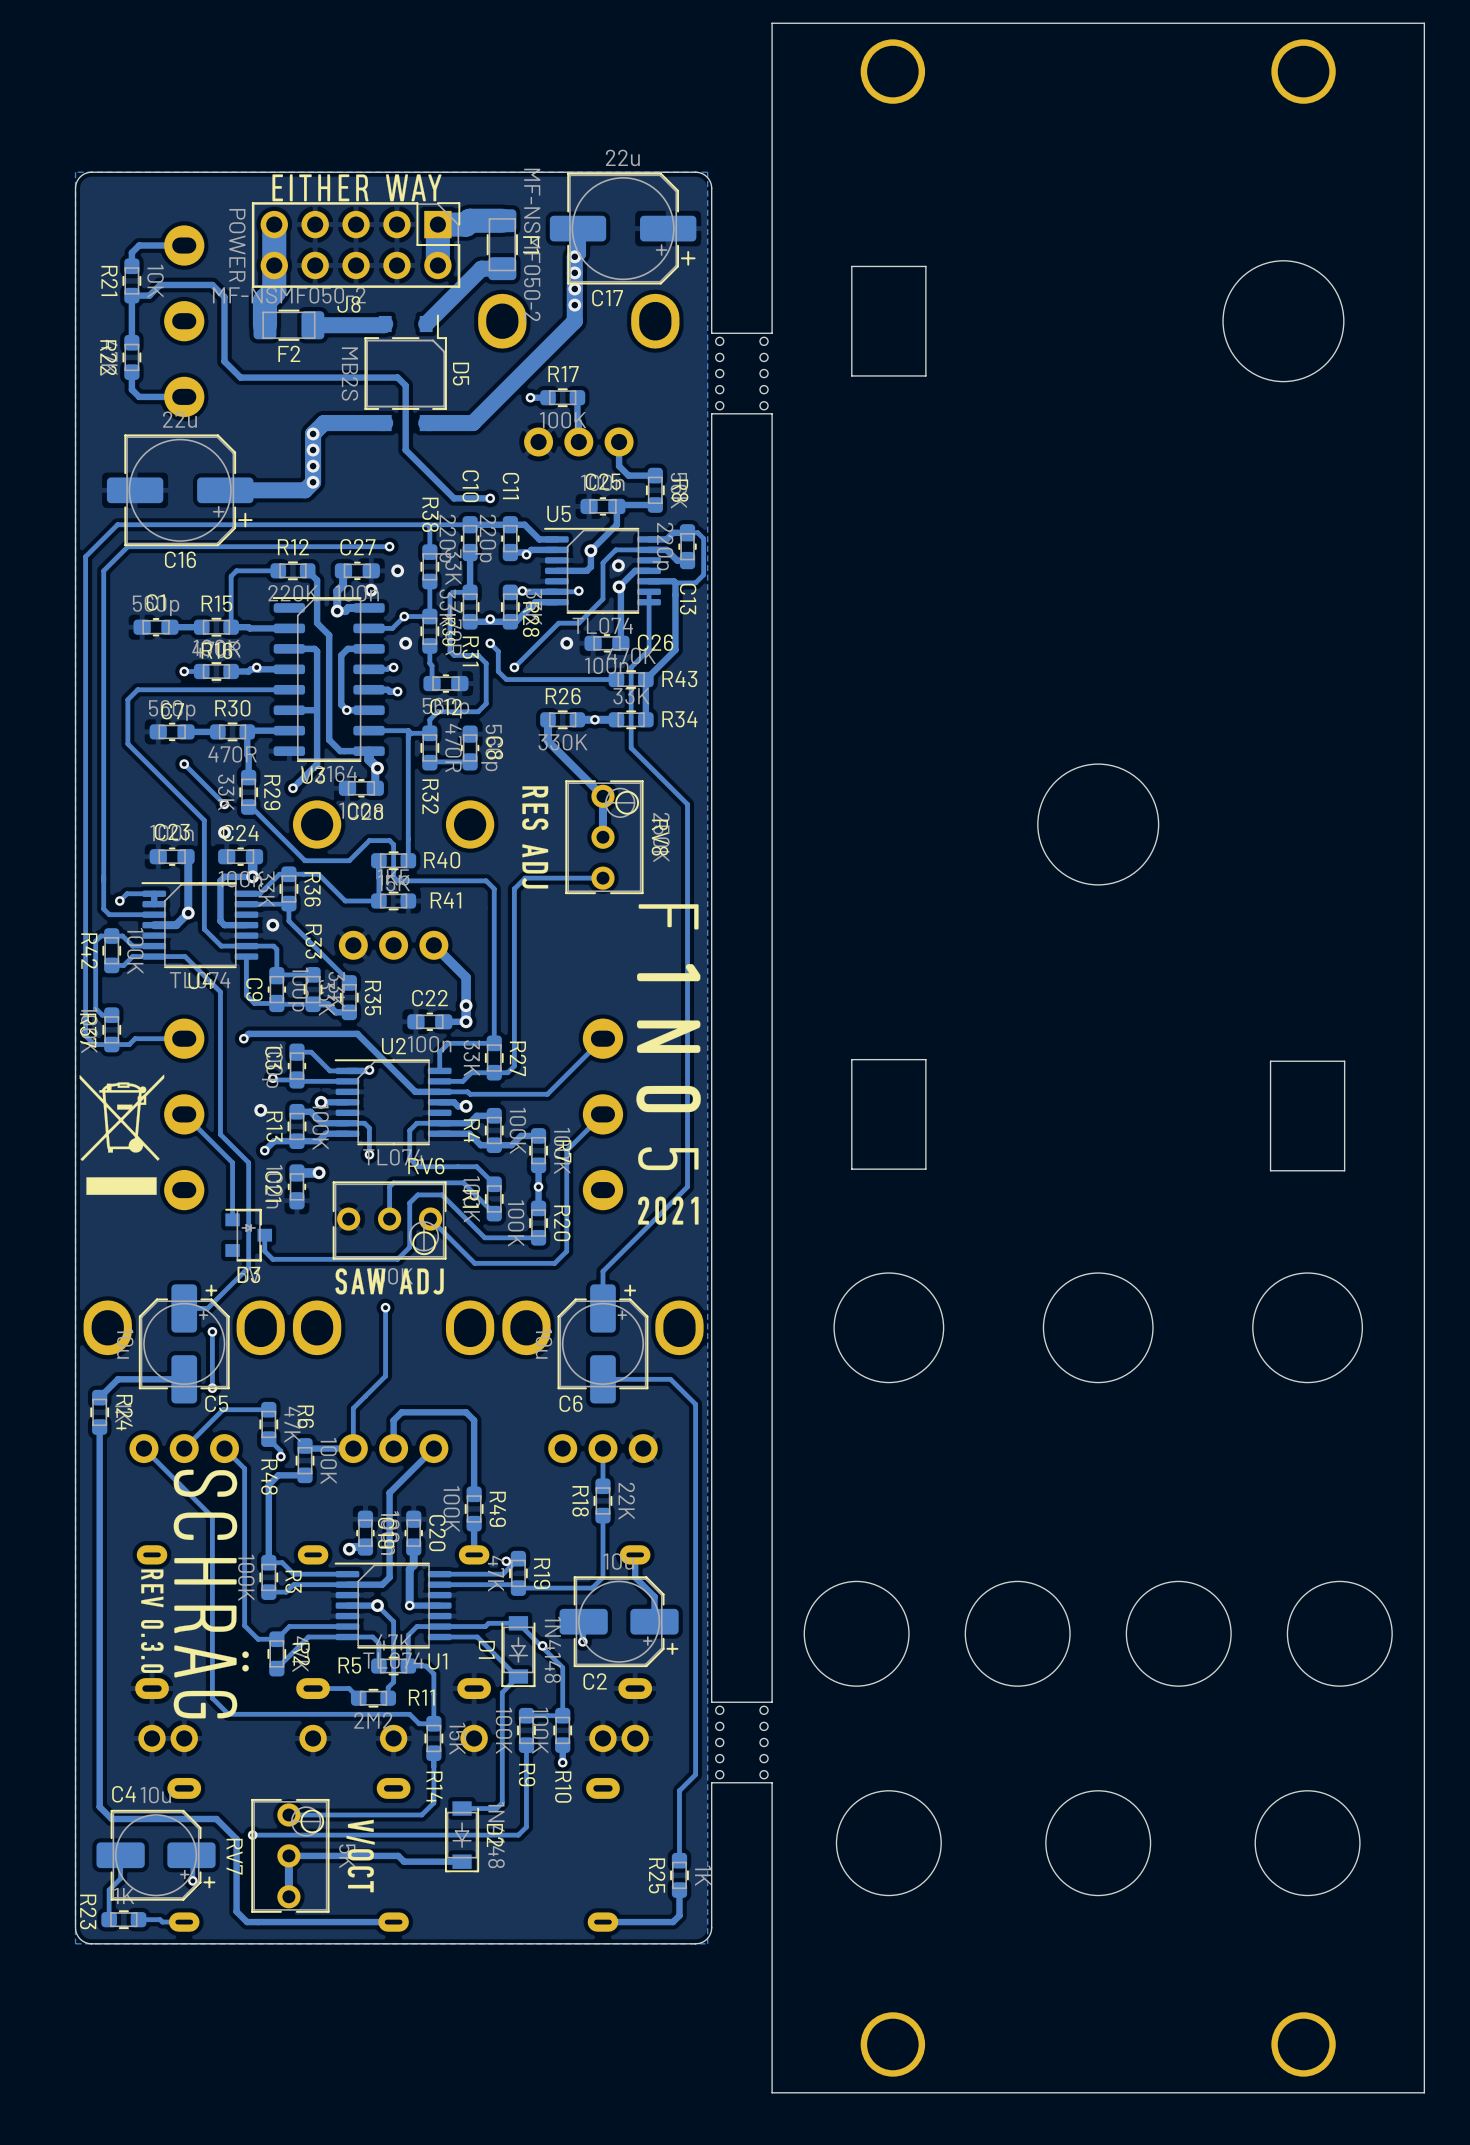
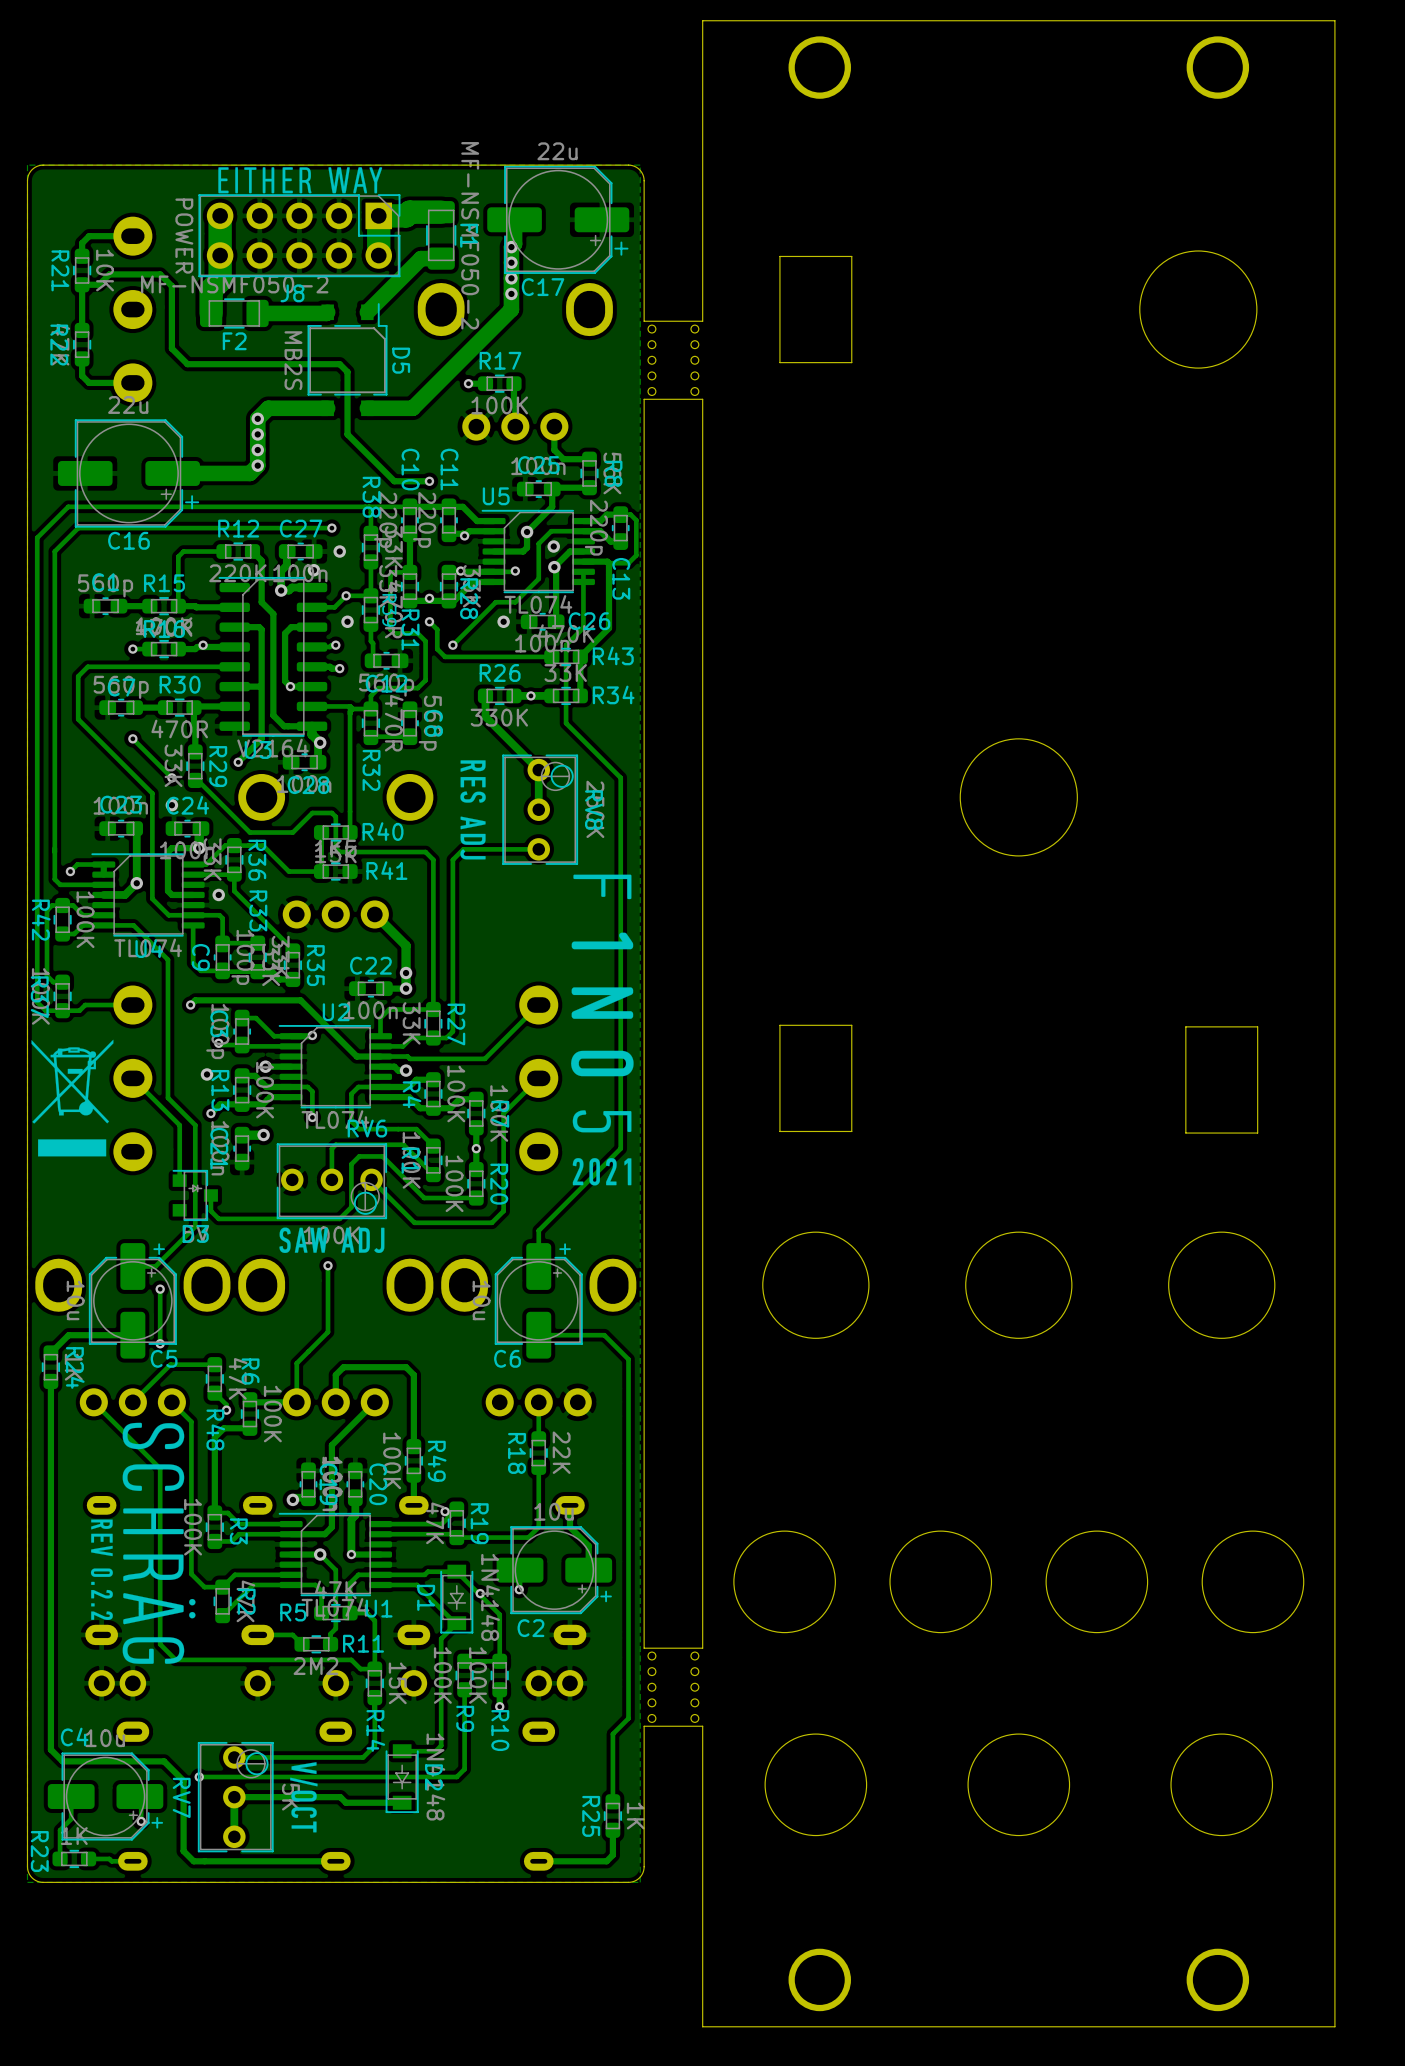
drawing shape: [79, 174, 701, 1893] -> [31, 167, 634, 1833]

